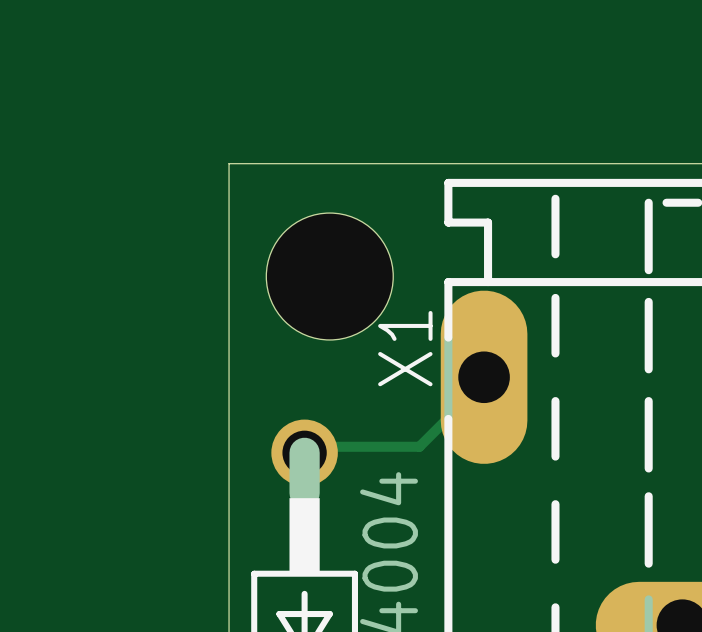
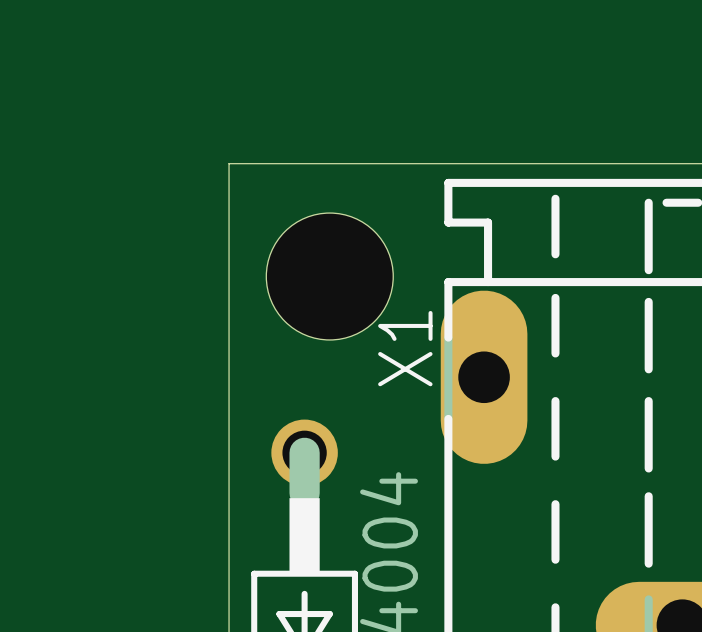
track: (484, 377) (482, 383) (419, 446) (310, 446) (304, 452) -> none

